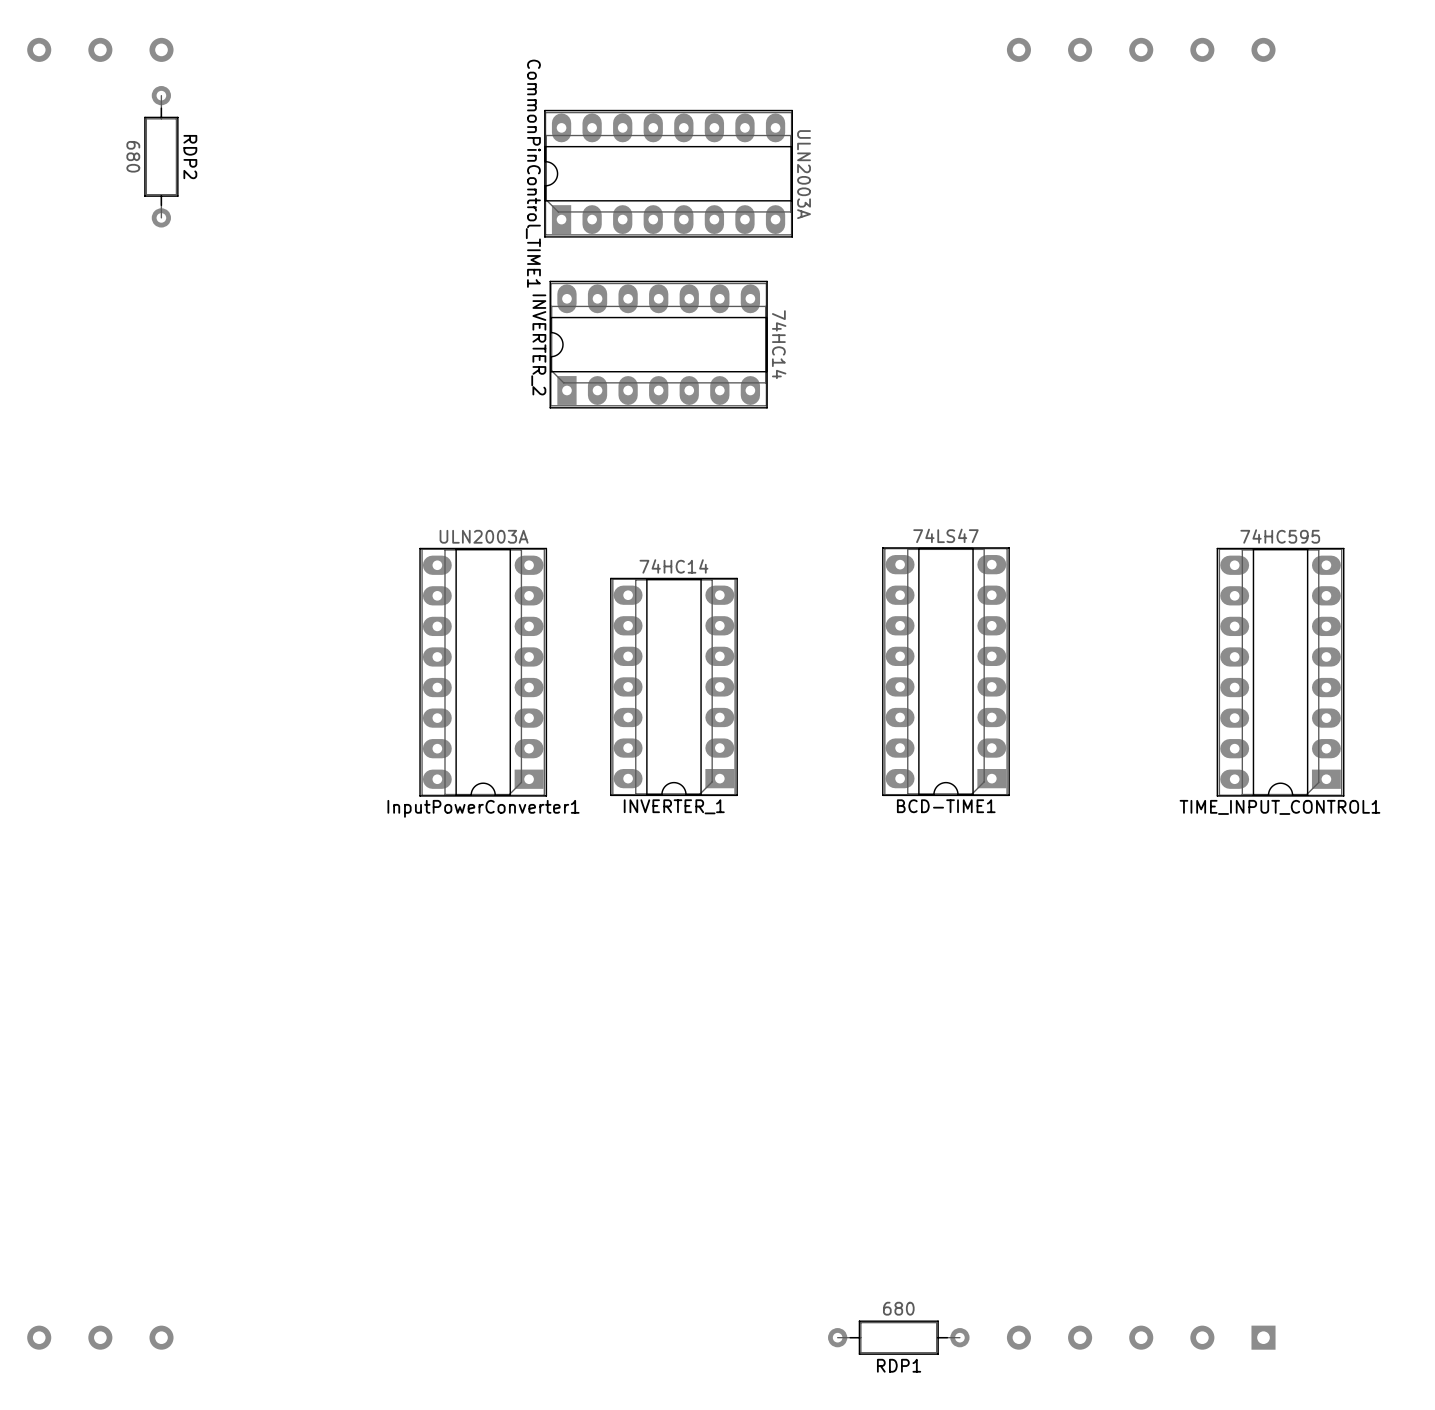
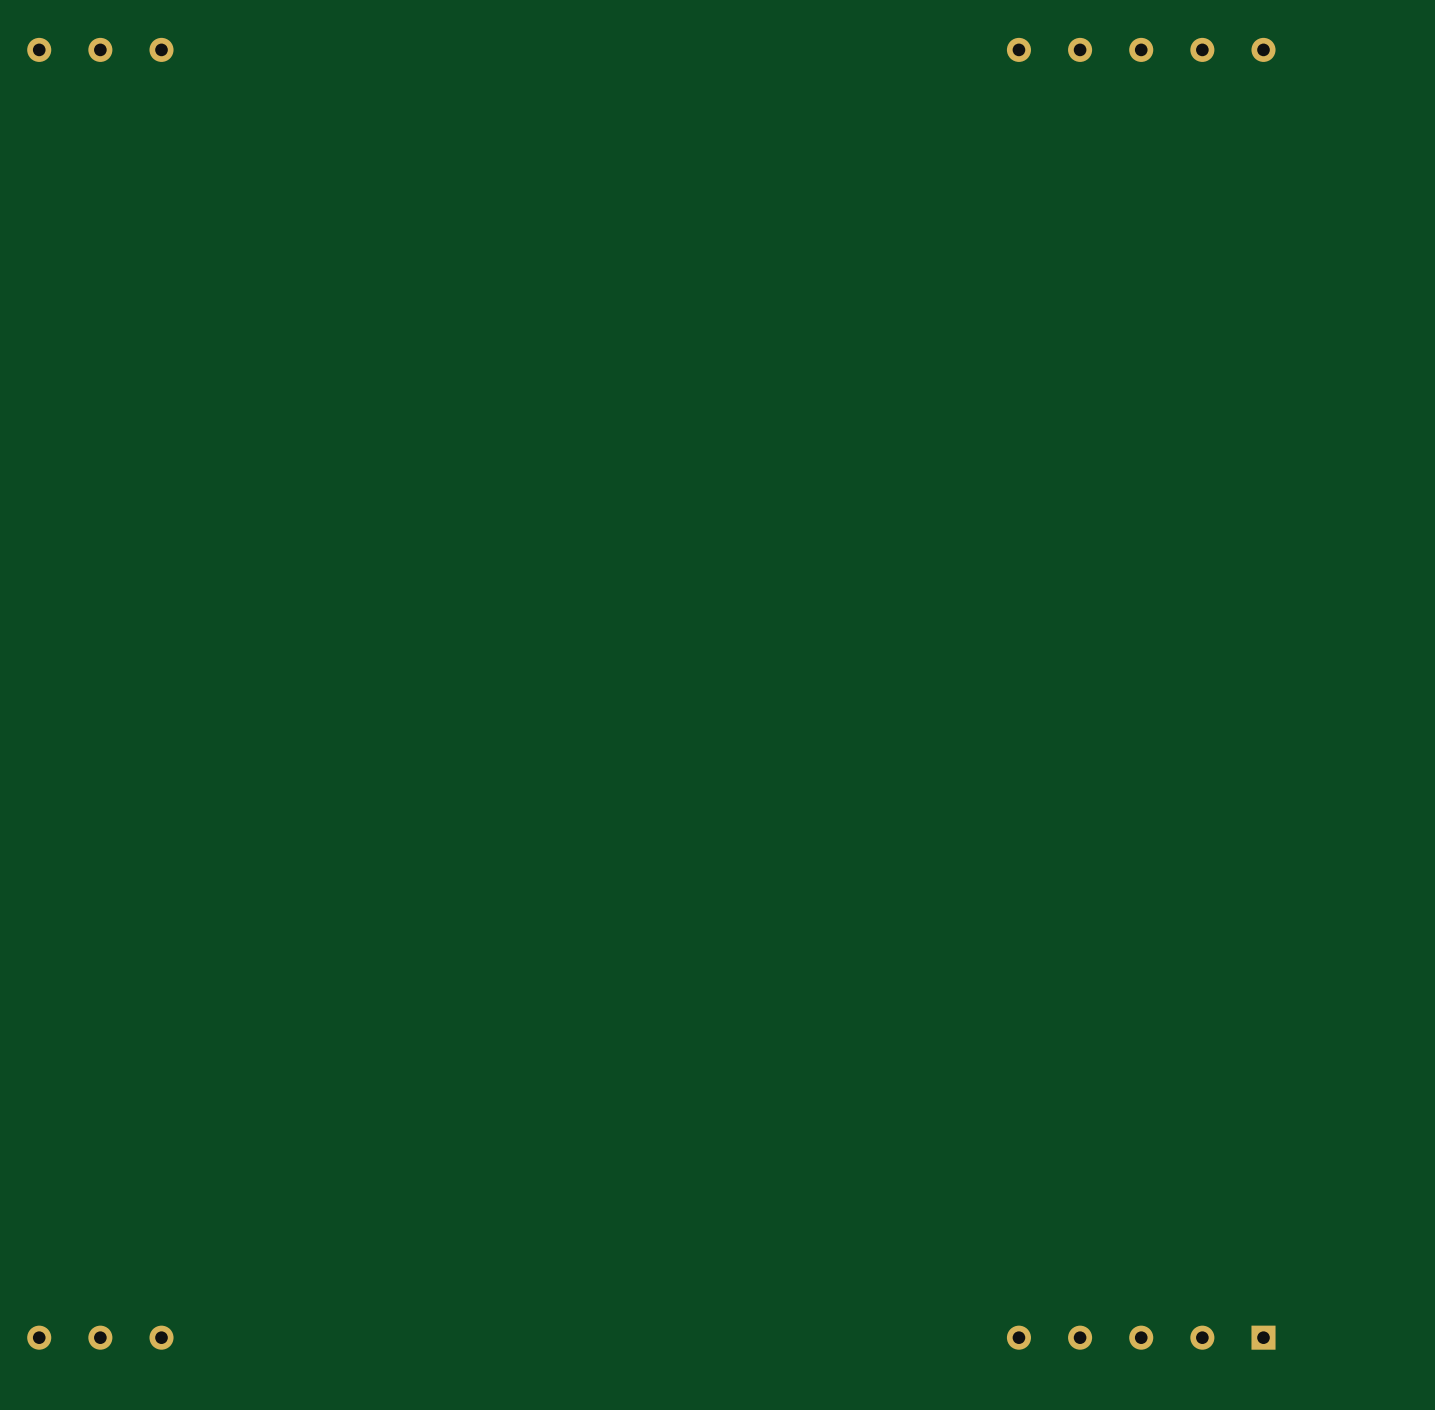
RDP2: 680 (161, 156) -> none
CommonPinControl_TIME1: ULN2003A (668, 173) -> none
INVERTER_2: 74HC14 (658, 344) -> none
BCD-TIME1: 74LS47 (945, 671) -> none
InputPowerConverter1: ULN2003A (483, 672) -> none
TIME_INPUT_CONTROL1: 74HC595 (1280, 672) -> none
INVERTER_1: 74HC14 (673, 686) -> none
RDP1: 680 (898, 1337) -> none

